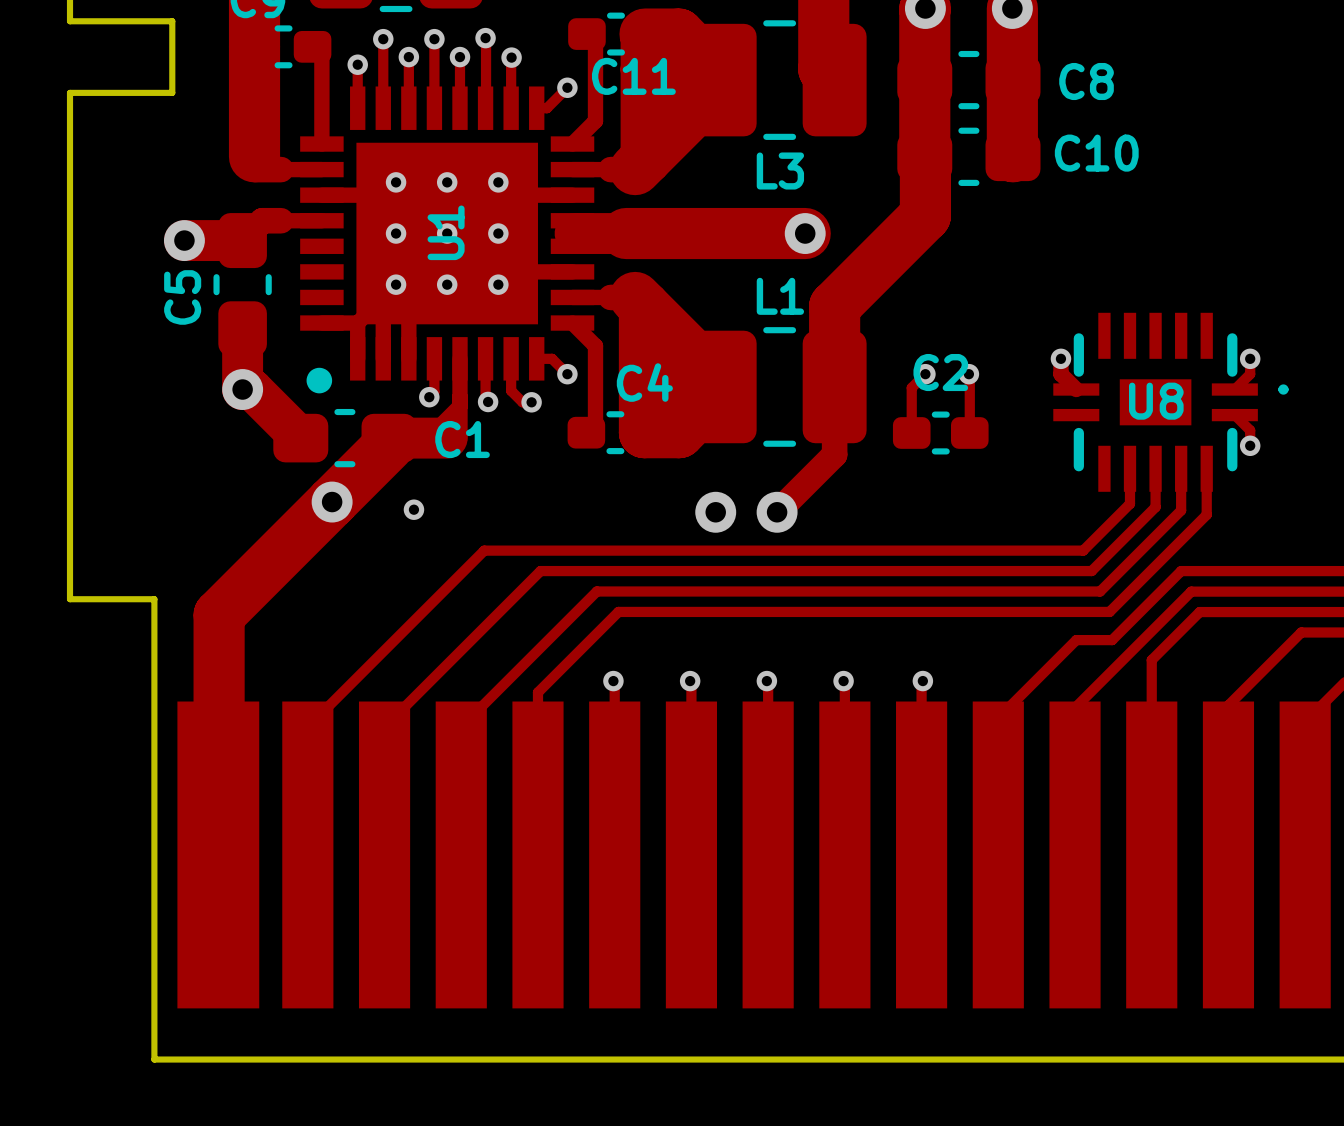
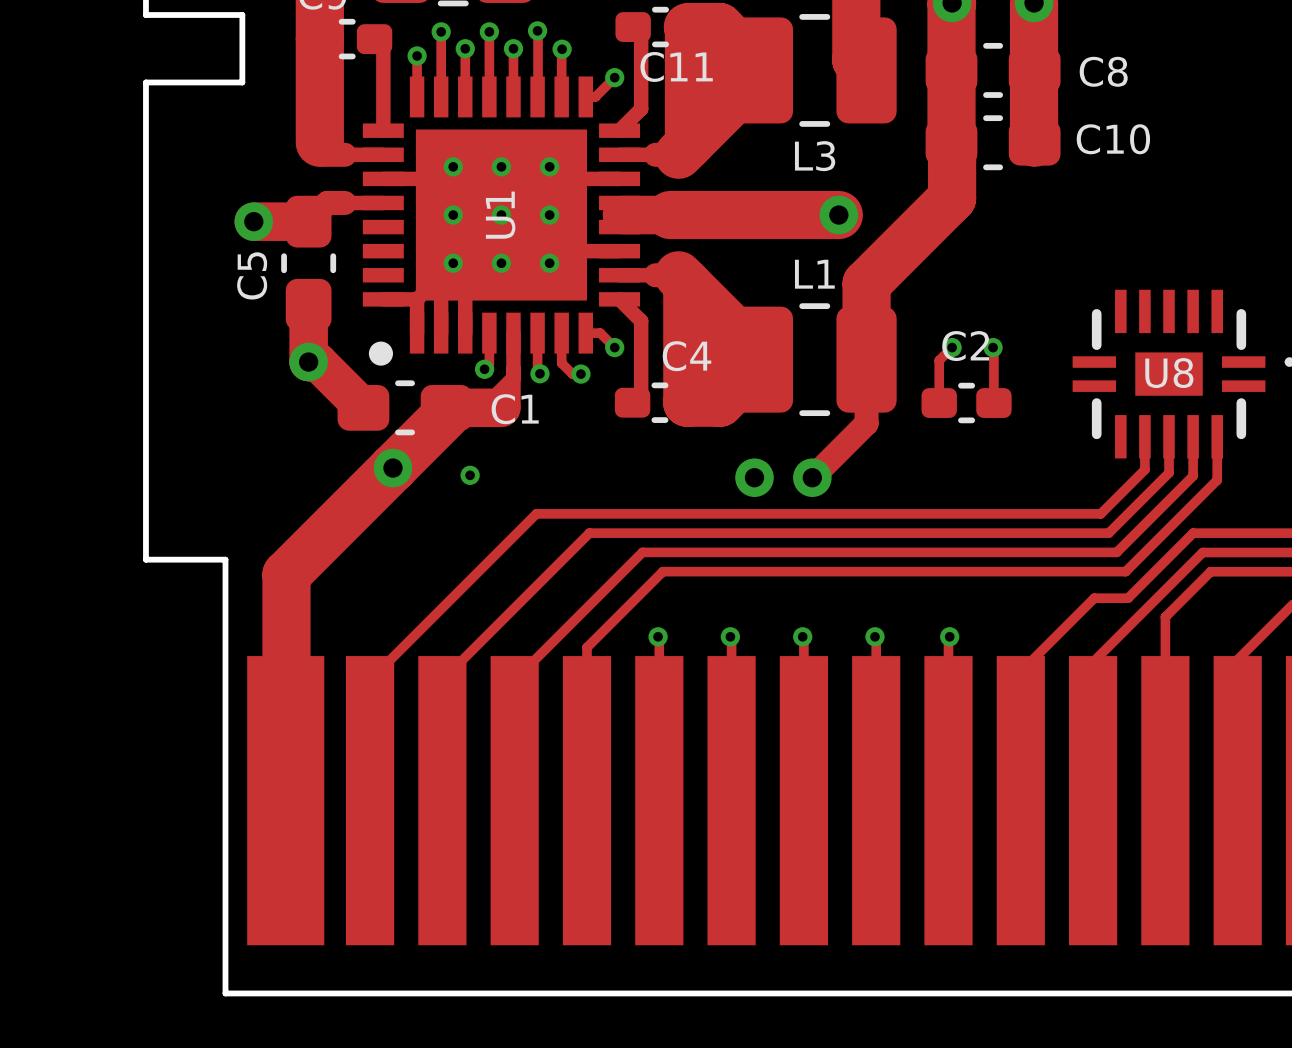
track: (1060, 358) (1060, 374) (1076, 389) -> none
via: (1060, 358) -> none
track: (1250, 358) (1250, 374) (1234, 389) -> none
via: (1250, 358) -> none
track: (1234, 415) (1250, 430) (1250, 445) -> none
via: (1250, 445) -> none

